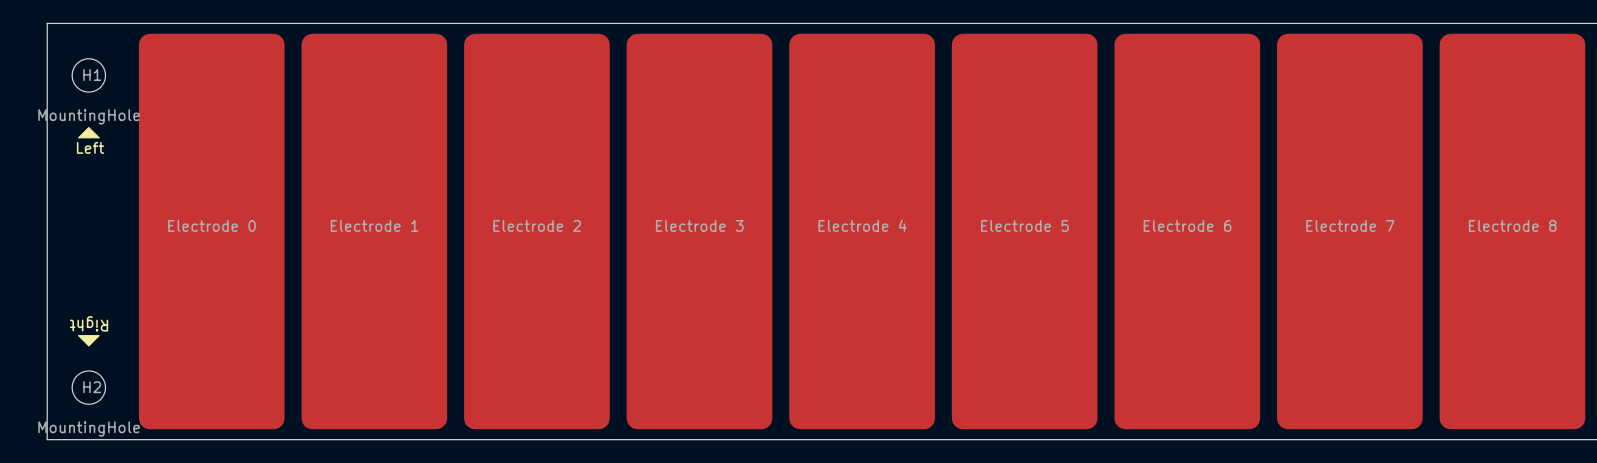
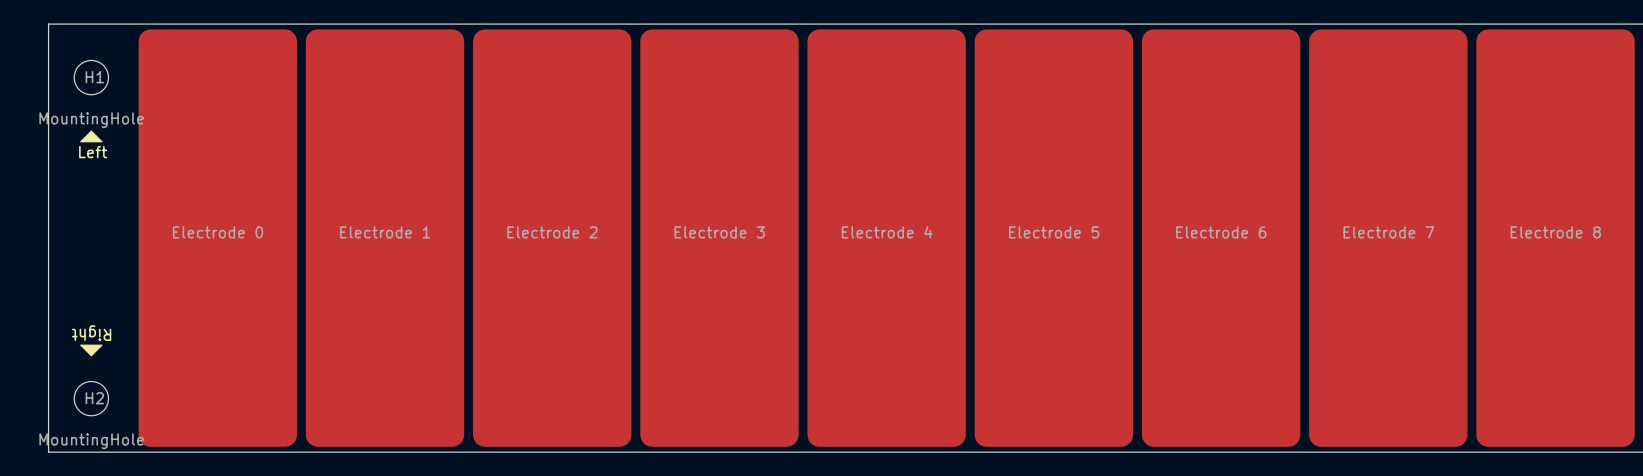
part footprint: [138, 33, 285, 430] -> [138, 29, 297, 447]
part footprint: [301, 33, 448, 430] -> [305, 29, 465, 447]
part footprint: [464, 33, 610, 430] -> [473, 29, 632, 447]
part footprint: [626, 33, 773, 430] -> [640, 29, 799, 447]
part footprint: [789, 33, 935, 430] -> [807, 29, 966, 447]
part footprint: [951, 33, 1098, 430] -> [974, 29, 1134, 447]
part footprint: [1114, 33, 1261, 430] -> [1141, 29, 1301, 447]
part footprint: [1277, 33, 1423, 430] -> [1309, 29, 1468, 447]
part footprint: [1439, 33, 1586, 430] -> [1476, 29, 1635, 447]

